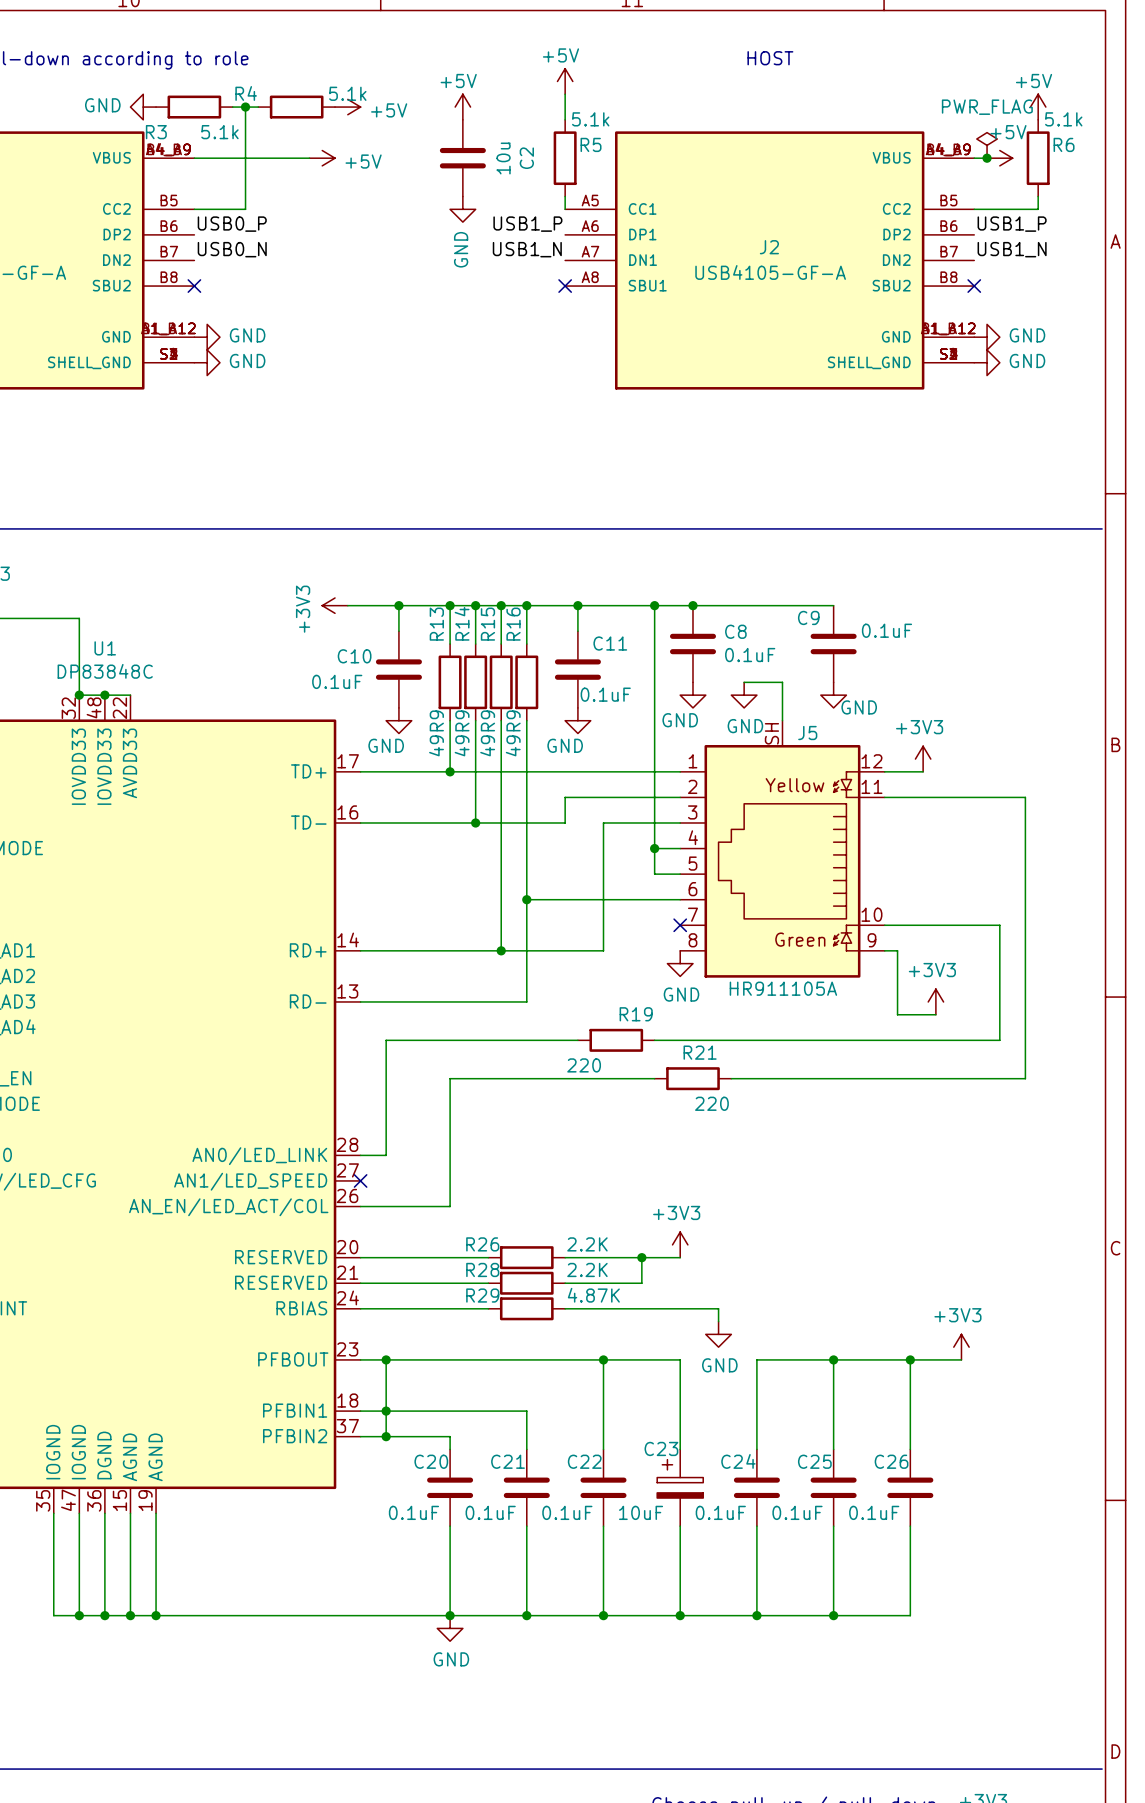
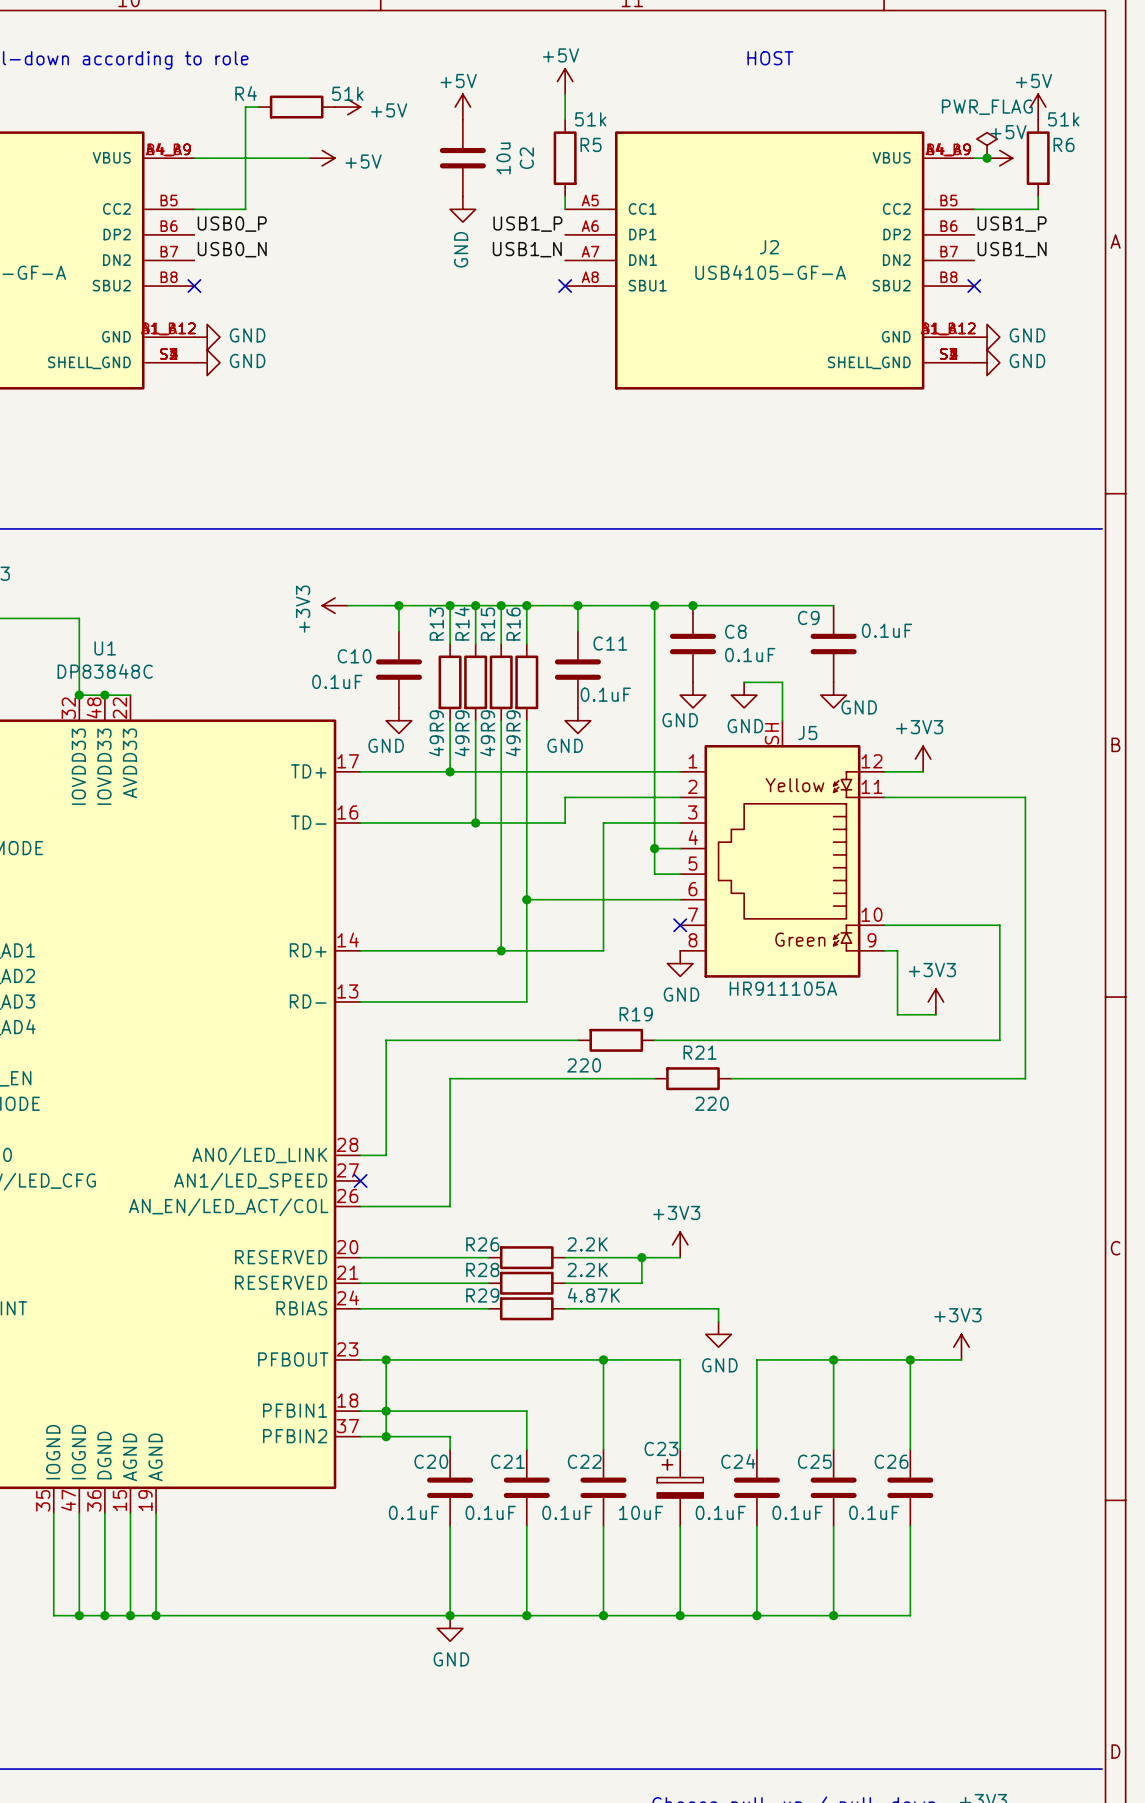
R4 value: 5.1k (347, 93) -> 51k (347, 93)
power symbol: GND (143, 107) -> none
R3: 5.1k (194, 107) -> none
wire: (232, 107) (245, 107) -> none
junction: (245, 107) -> none
R5 value: 5.1k (590, 119) -> 51k (590, 119)
R6 value: 5.1k (1063, 119) -> 51k (1063, 119)

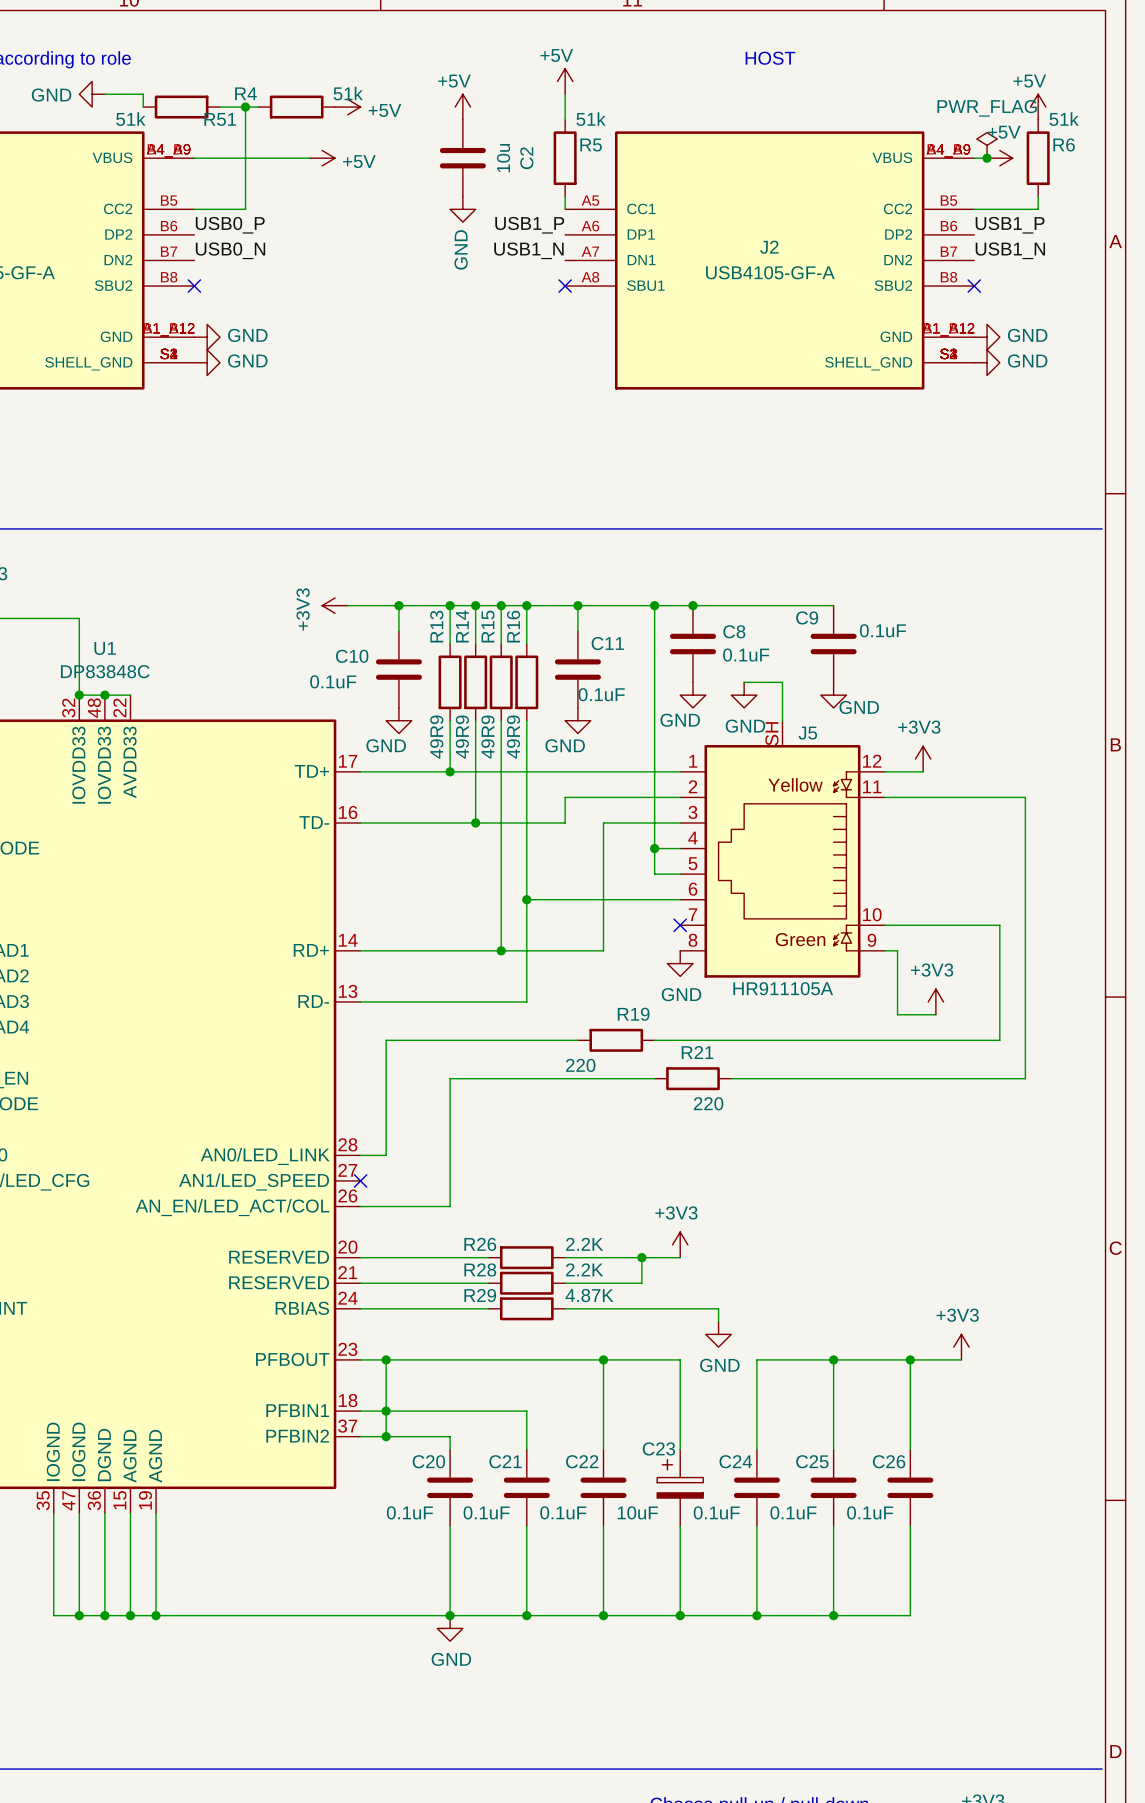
power symbol: none -> GND (92, 94)
wire: none -> (104, 94) (143, 94) (143, 107)
R51: none -> 51k (181, 107)
wire: none -> (219, 107) (245, 107)
junction: none -> (245, 107)

